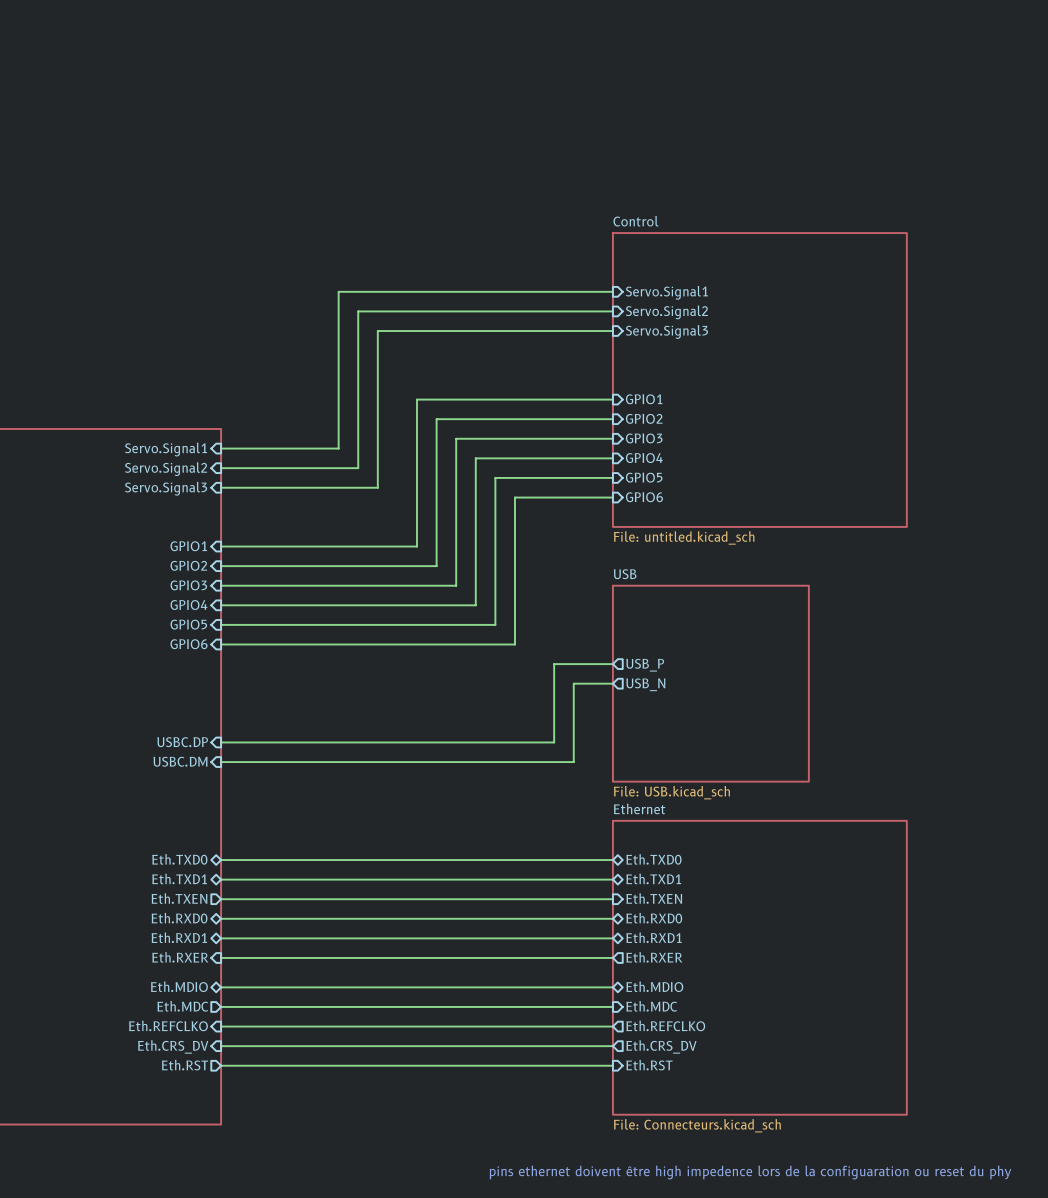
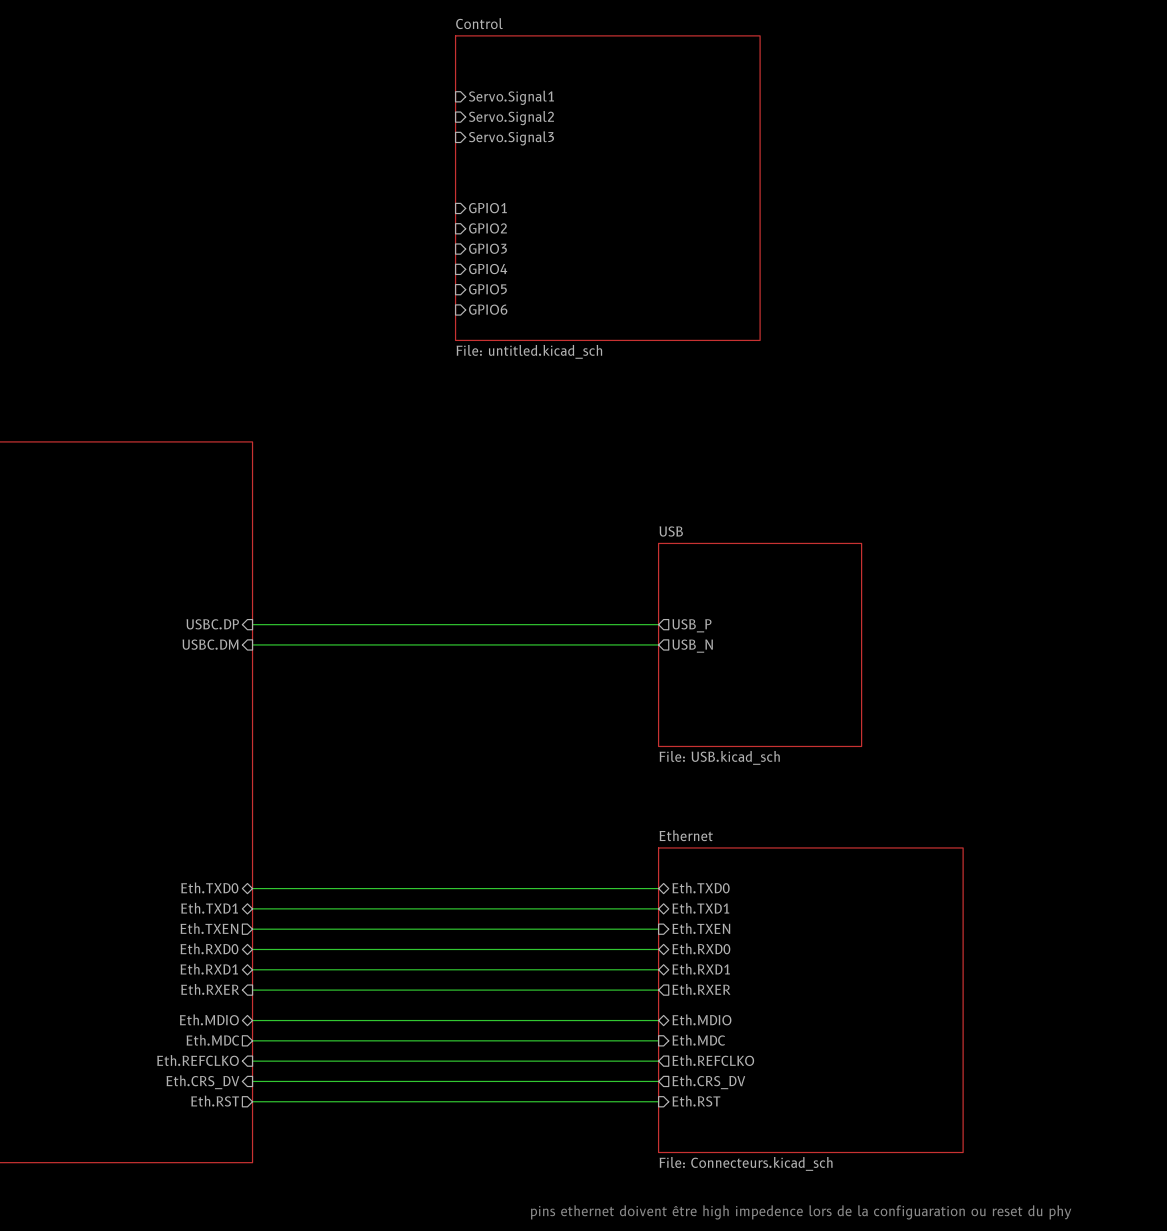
sheet pin: none -> Servo.Signal1 (511, 97)
sheet pin: none -> Servo.Signal2 (511, 118)
sheet pin: none -> Servo.Signal3 (511, 138)
sheet Control: none -> File: untitled.kicad_sch (607, 188)
sheet pin: none -> GPIO1 (487, 208)
sheet pin: none -> GPIO2 (487, 228)
sheet pin: none -> GPIO3 (487, 248)
sheet pin: none -> GPIO4 (488, 269)
sheet pin: none -> GPIO5 (487, 289)
wire: (612, 291) (338, 291) (338, 448) (221, 448) -> none
sheet pin: Servo.Signal1 (666, 292) -> none
sheet pin: none -> GPIO6 (488, 309)
wire: (612, 311) (358, 311) (358, 468) (221, 468) -> none
sheet pin: Servo.Signal2 (666, 312) -> none
wire: (612, 331) (377, 331) (377, 487) (221, 487) -> none
sheet pin: Servo.Signal3 (666, 331) -> none
sheet Control: File: untitled.kicad_sch (759, 380) -> none
wire: (612, 399) (417, 399) (417, 546) (221, 546) -> none
sheet pin: GPIO1 (644, 399) -> none
sheet pin: GPIO2 (644, 418) -> none
wire: (612, 419) (436, 419) (436, 566) (221, 566) -> none
wire: (612, 438) (456, 438) (456, 585) (221, 585) -> none
sheet pin: GPIO3 (644, 438) -> none
sheet pin: Servo.Signal1 (166, 449) -> none
wire: (612, 458) (475, 458) (475, 605) -> (658, 624) (516, 624)
sheet pin: GPIO4 (644, 458) -> none
sheet pin: Servo.Signal2 (166, 469) -> none
wire: (612, 477) (495, 477) (495, 624) -> (658, 644) (536, 644)
sheet pin: GPIO5 (644, 477) -> none
sheet pin: Servo.Signal3 (166, 488) -> none
wire: (612, 497) (514, 497) (514, 644) (221, 644) -> none
sheet pin: GPIO6 (644, 497) -> none
sheet pin: GPIO1 (188, 546) -> none
sheet pin: GPIO2 (188, 565) -> none
sheet pin: GPIO3 (188, 585) -> none
sheet pin: GPIO4 (188, 605) -> USBC.DP (212, 624)
sheet pin: GPIO5 (188, 624) -> USBC.DM (210, 644)
sheet pin: GPIO6 (189, 644) -> none
wire: (612, 664) (554, 664) (554, 742) (221, 742) -> none
sheet pin position: USB_P (645, 665) -> USB_P (691, 625)
wire: (612, 683) (573, 683) (573, 762) (221, 762) -> none
sheet USB position: (710, 683) -> (760, 644)
sheet pin position: USB_N (645, 684) -> USB_N (692, 646)
sheet pin: USBC.DP (182, 742) -> none
sheet pin: USBC.DM (180, 761) -> none

